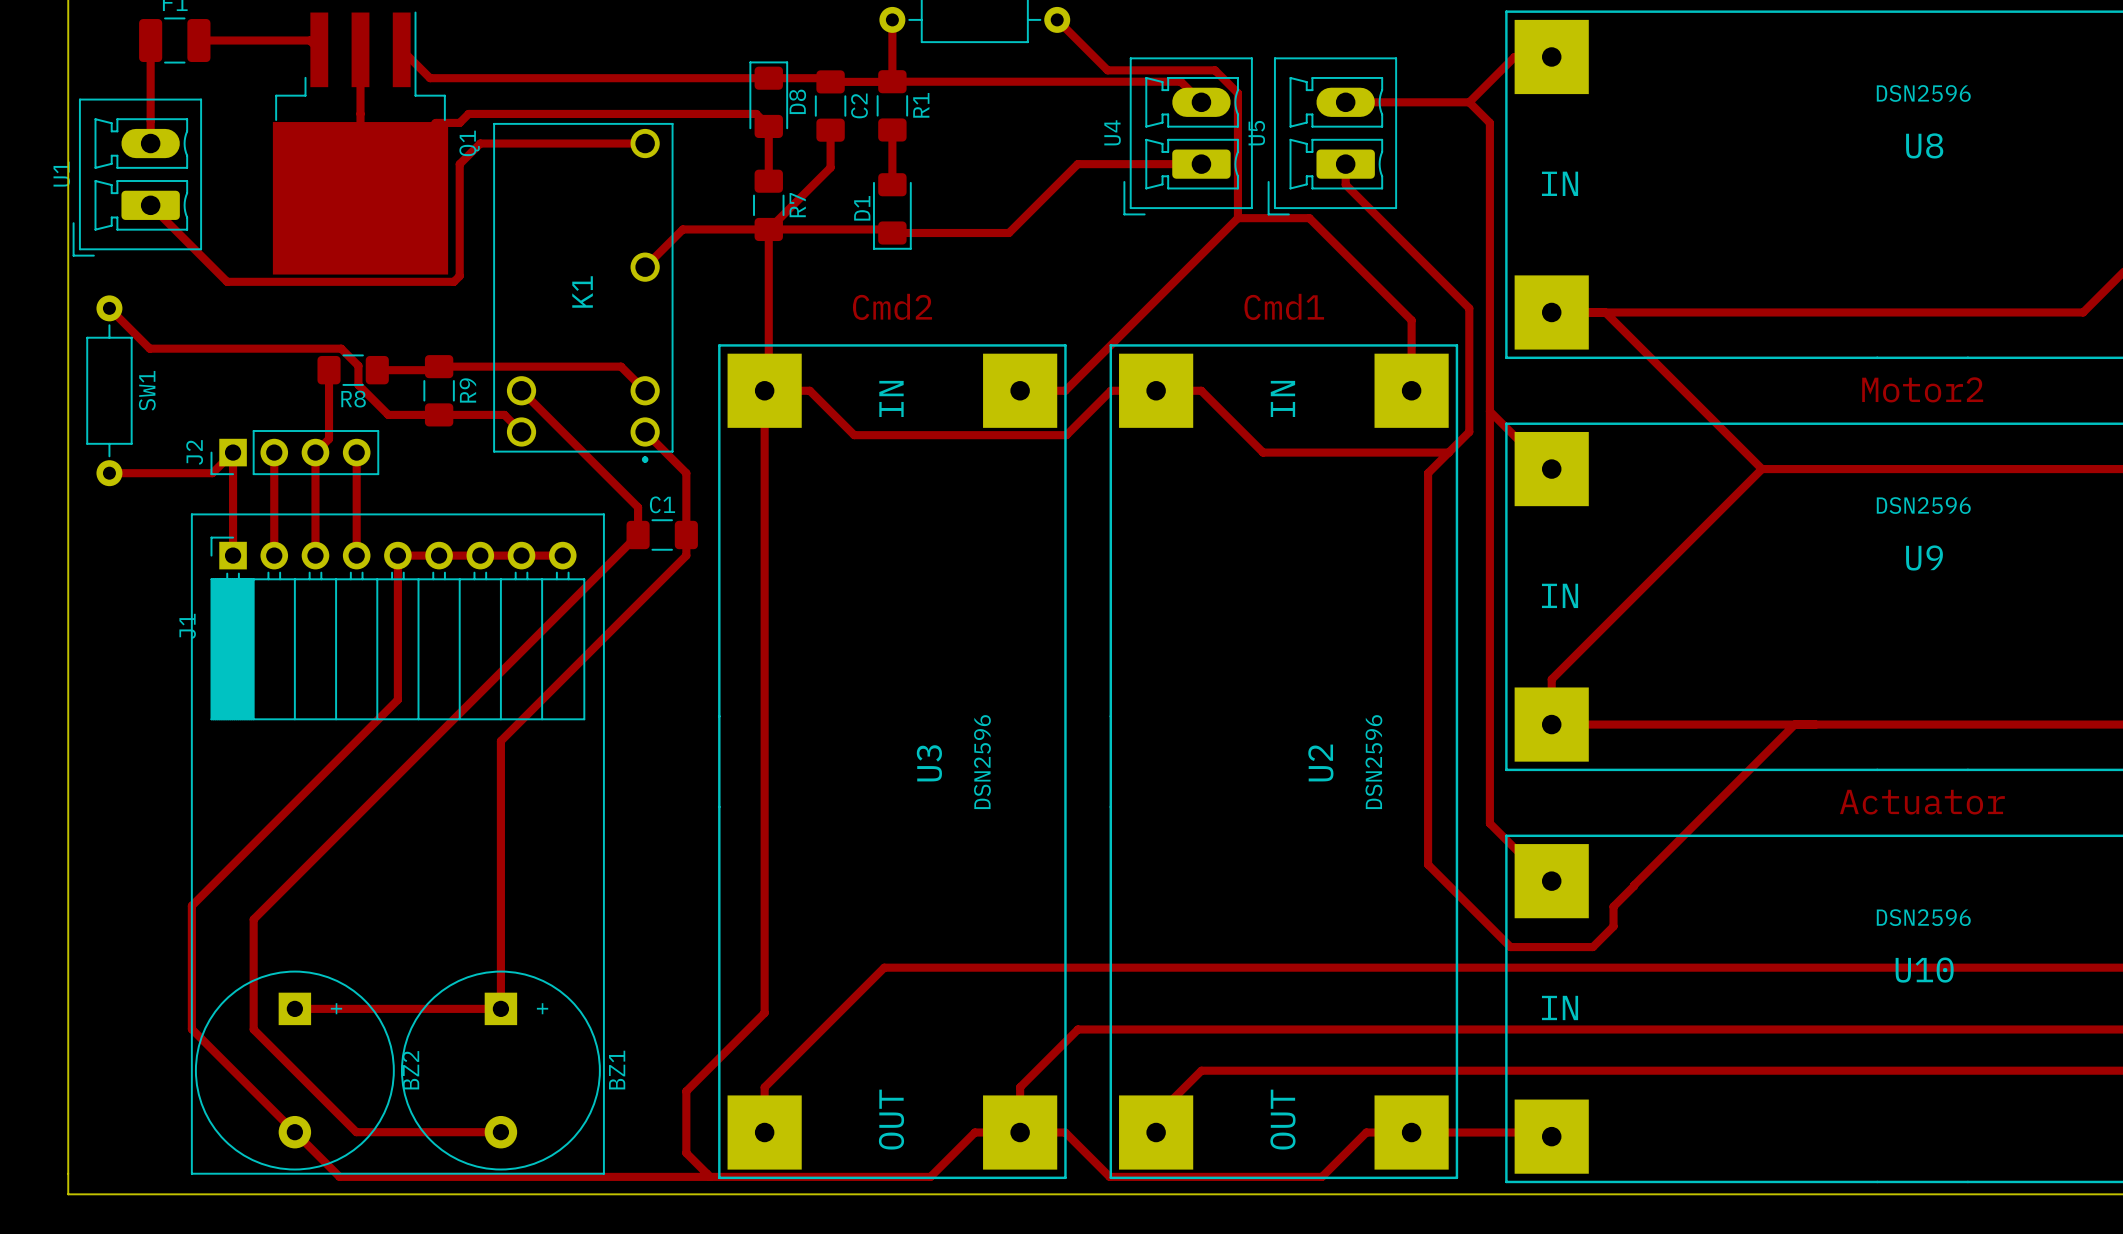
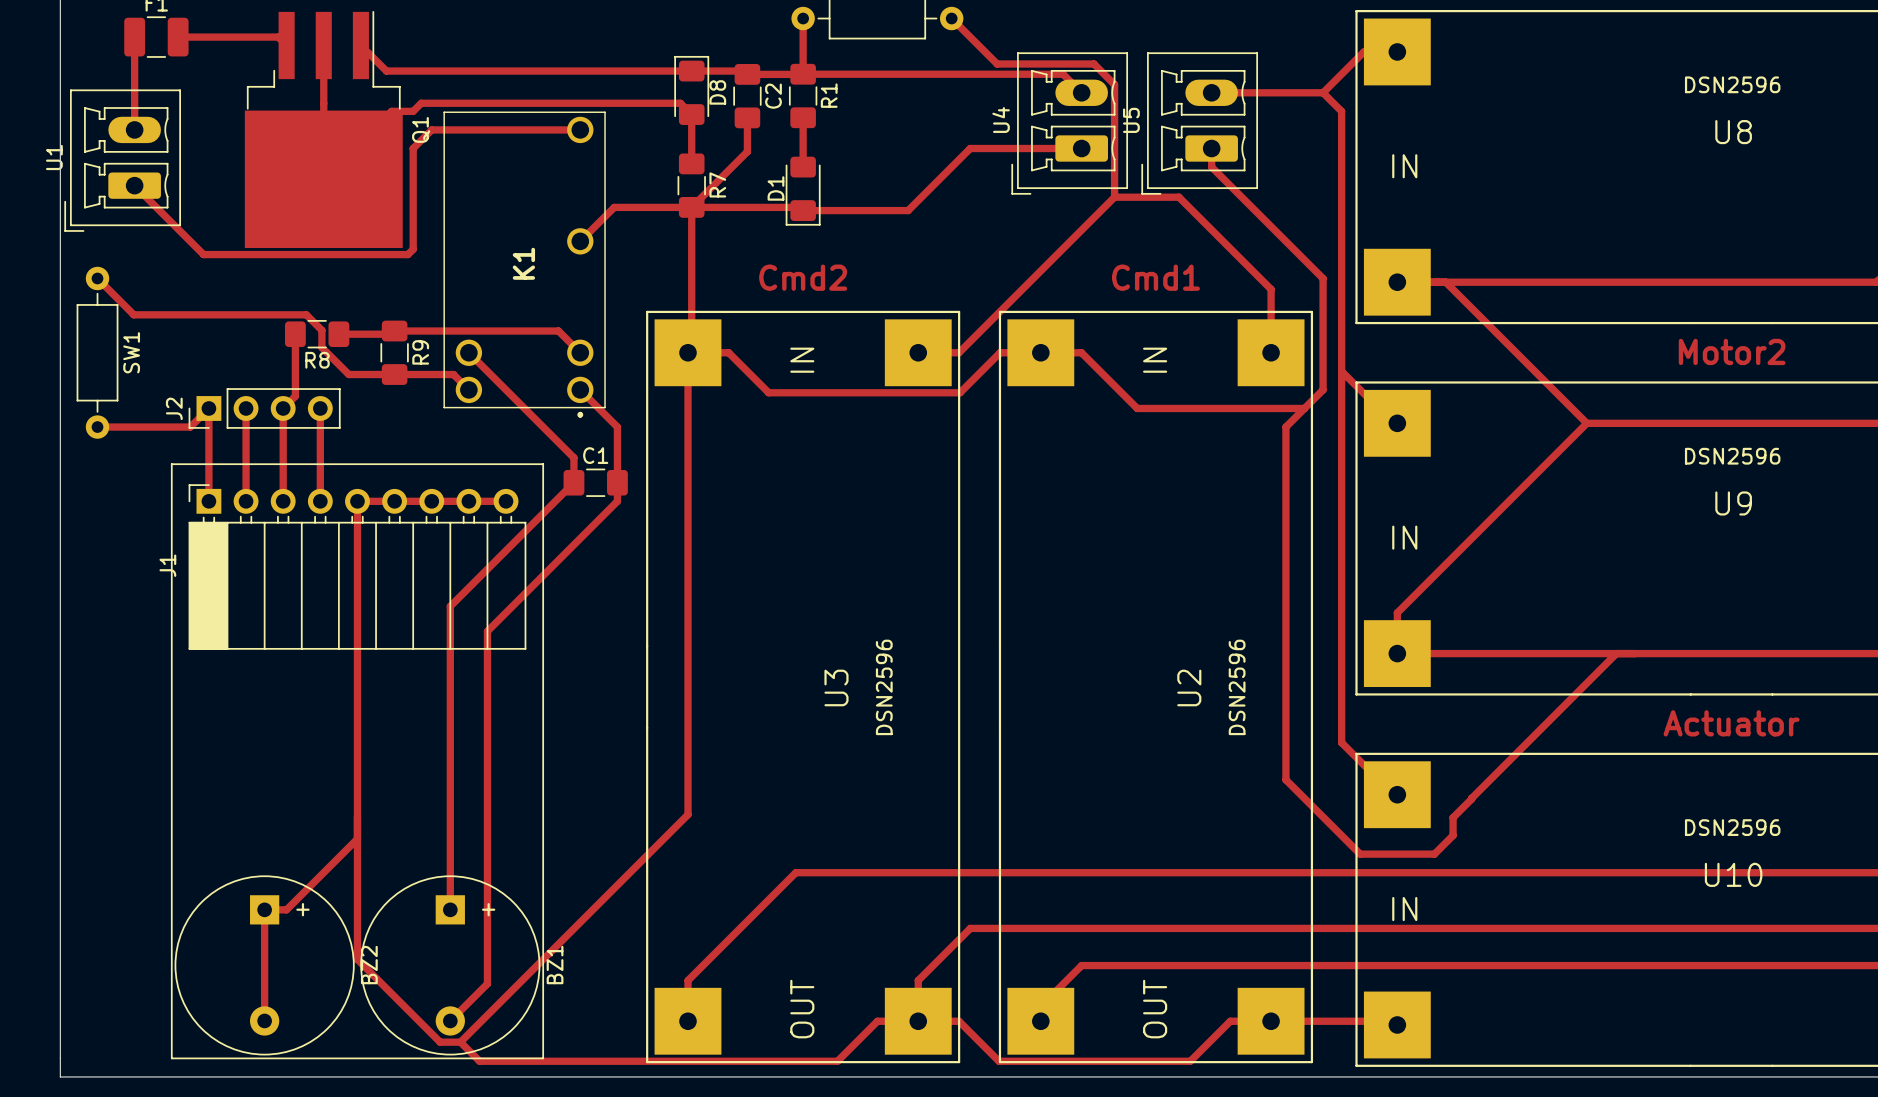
track: (500, 672) (253, 919) (253, 1029) (356, 1132) (500, 1132) -> (487, 631) (487, 983) (450, 1020)
track: (397, 699) (191, 905) (191, 1029) (339, 1176) (533, 1176) -> (357, 631) (357, 959) (440, 1042) (460, 1042)
track: (542, 699) (500, 741) -> (450, 606) (450, 668)
track: (764, 903) (764, 1013) (686, 1091) (686, 1153) (710, 1176) -> (688, 814) (460, 1042)
track: none -> (264, 909) (264, 1020)
track: (319, 1008) (500, 1008) -> (286, 909) (357, 838)
track: none -> (460, 1042) (479, 1061)

